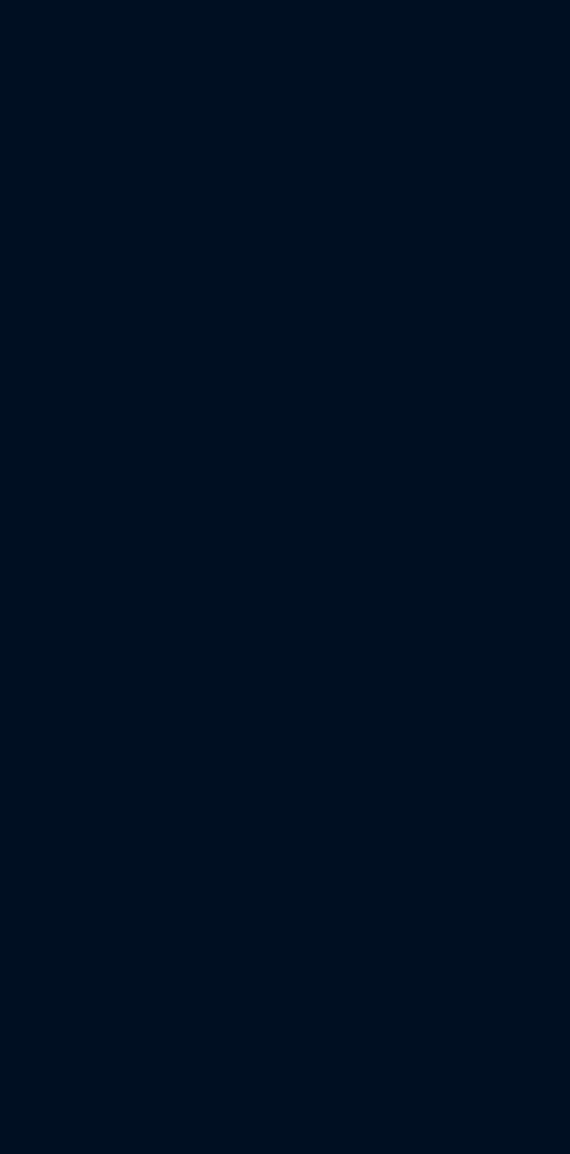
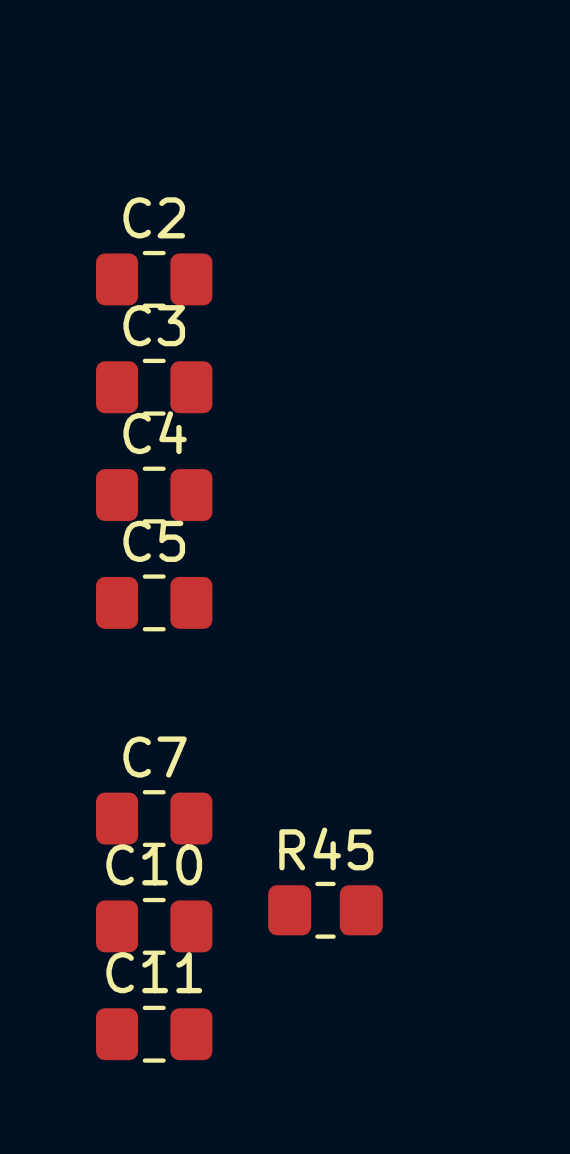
C2: none -> (154, 279)
C3: none -> (154, 387)
C4: none -> (154, 495)
C5: none -> (154, 602)
C7: none -> (154, 818)
R45: none -> (325, 910)
C10: none -> (154, 926)
C11: none -> (154, 1034)

